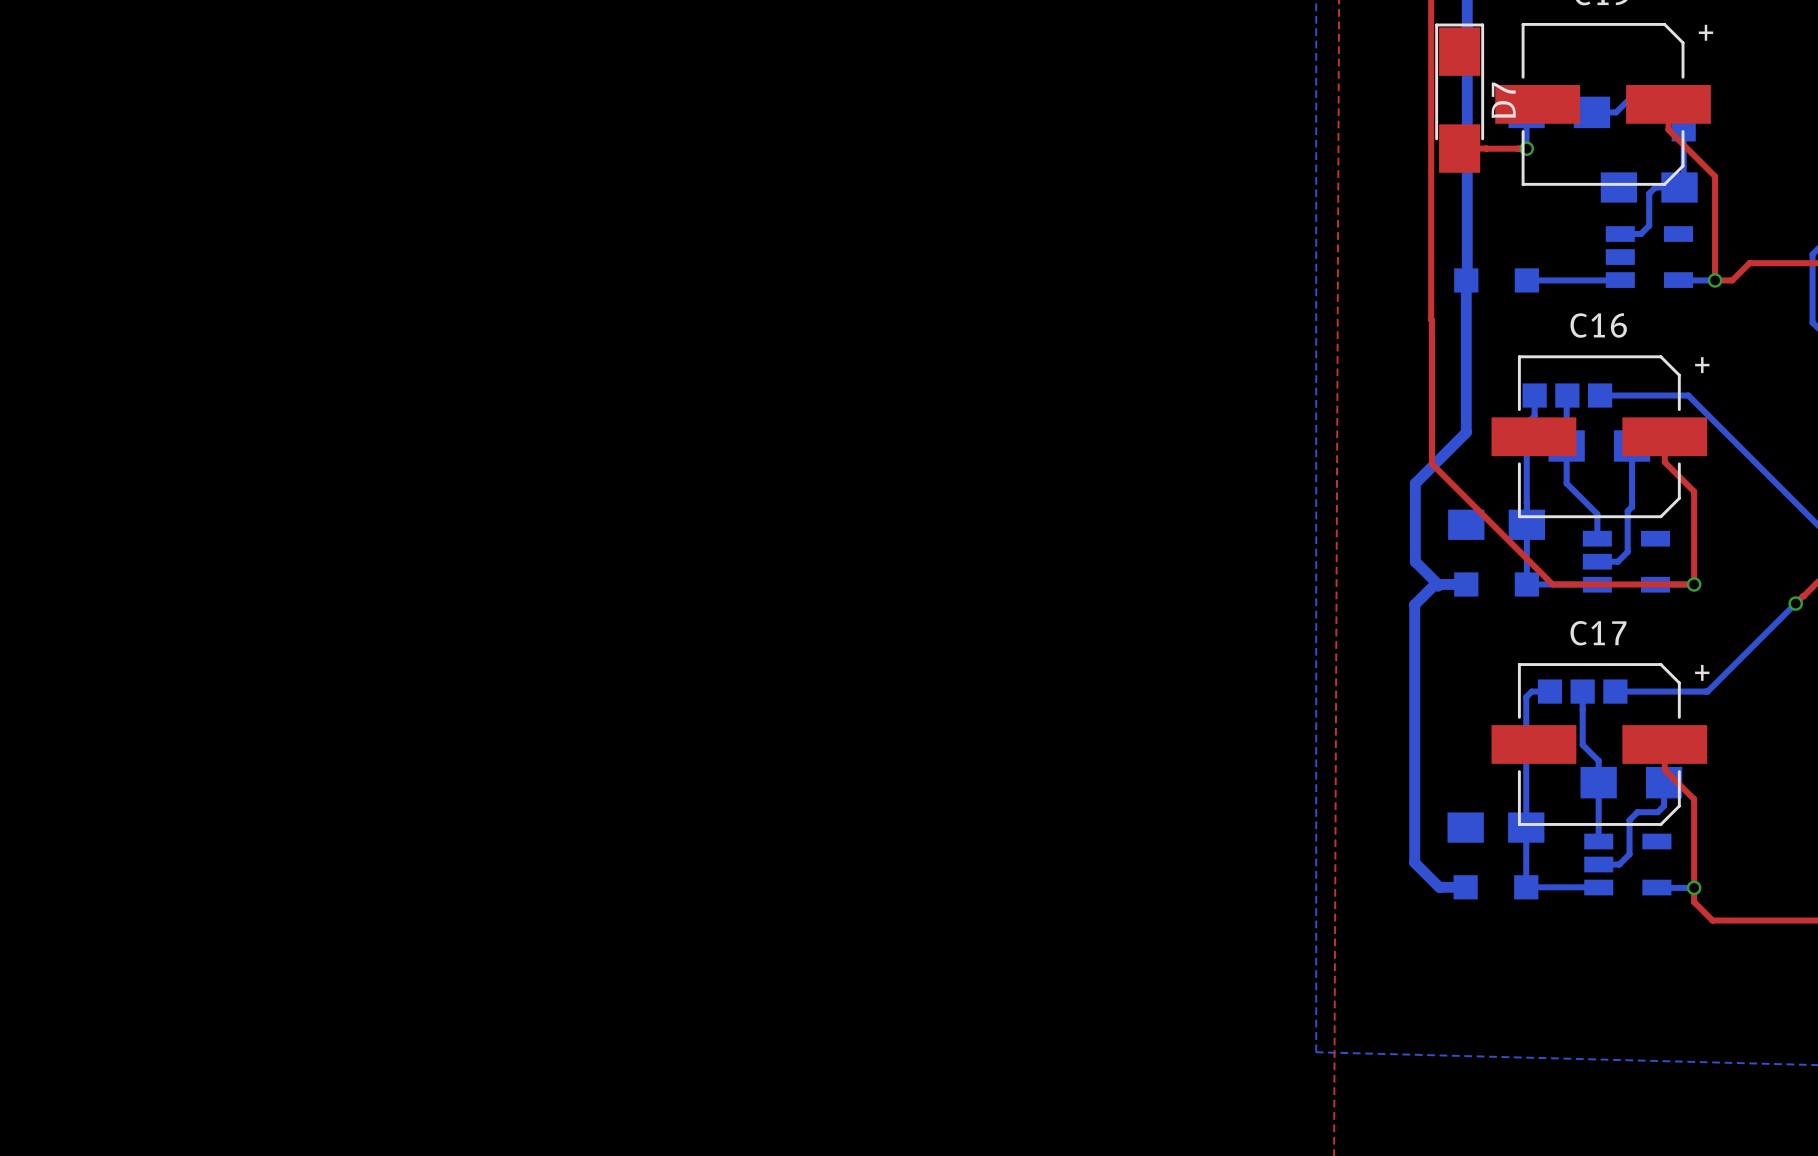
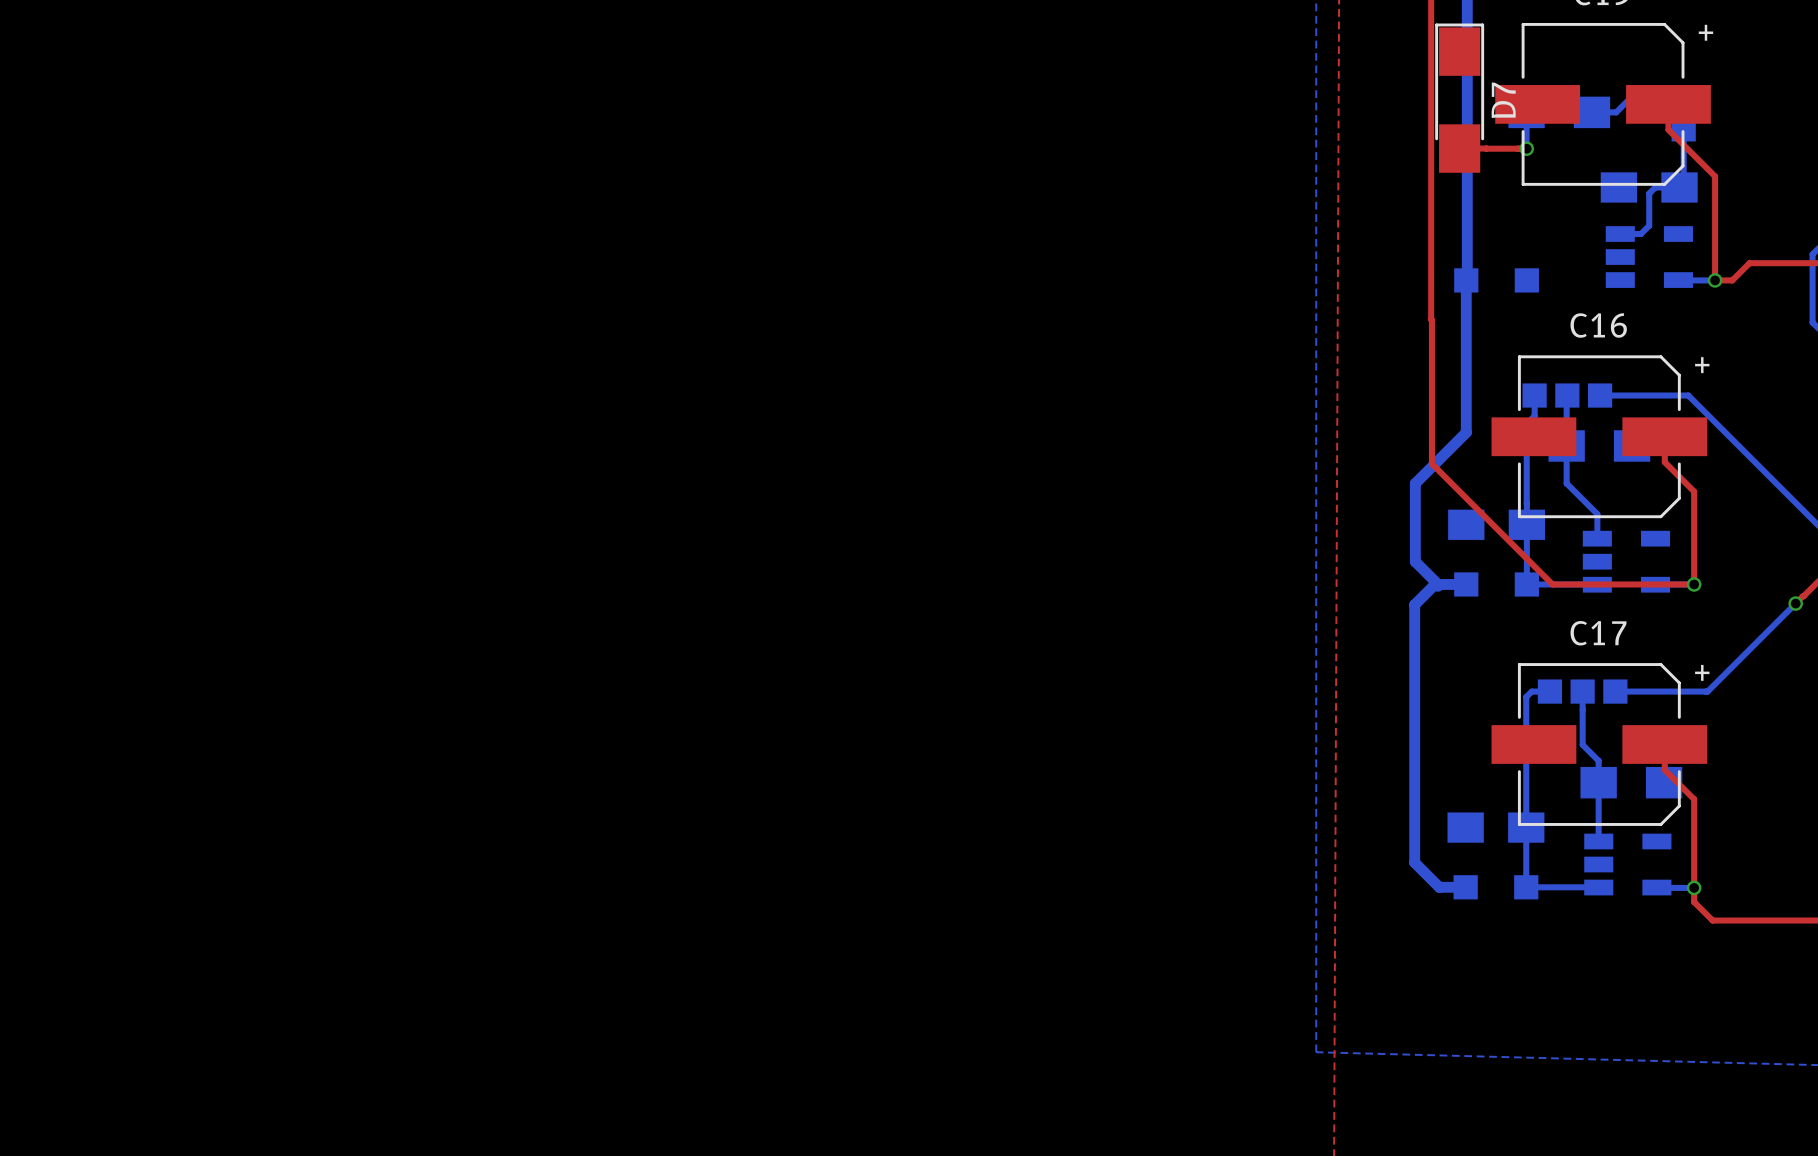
bottom track: (1620, 280) (1526, 280) -> none
bottom track: (1632, 445) (1632, 506) (1627, 511) (1627, 551) (1617, 561) (1597, 561) -> none
bottom track: (1664, 782) (1664, 805) (1657, 812) (1637, 812) (1629, 820) (1629, 854) (1619, 864) (1598, 864) -> none

